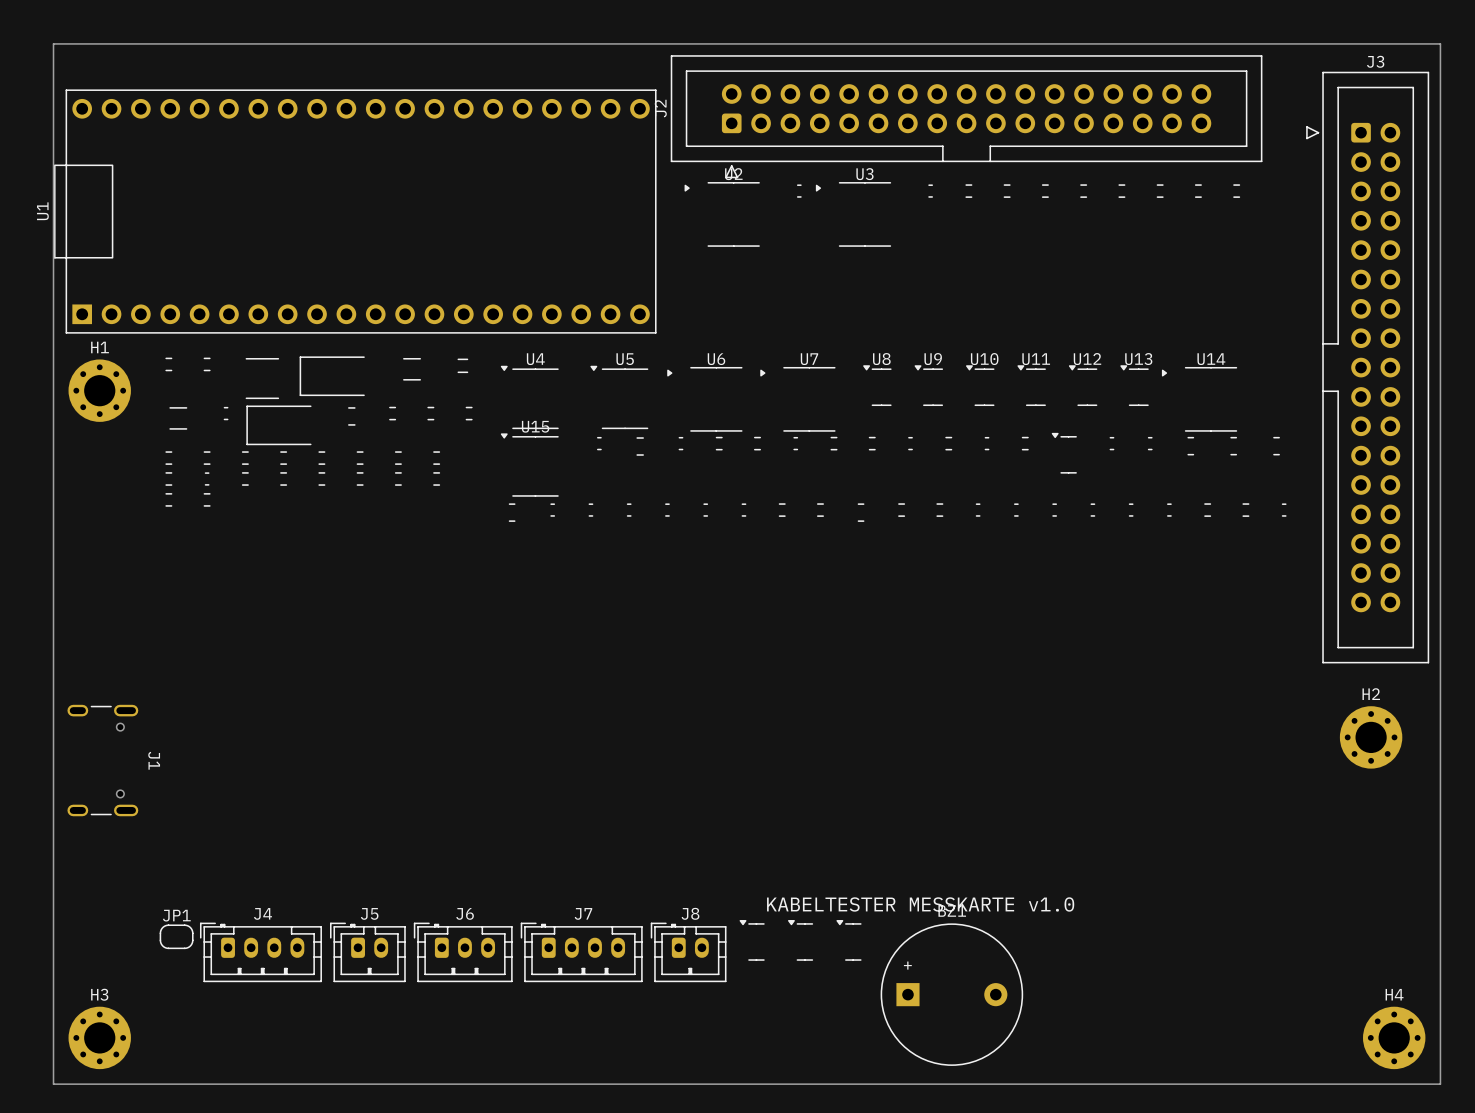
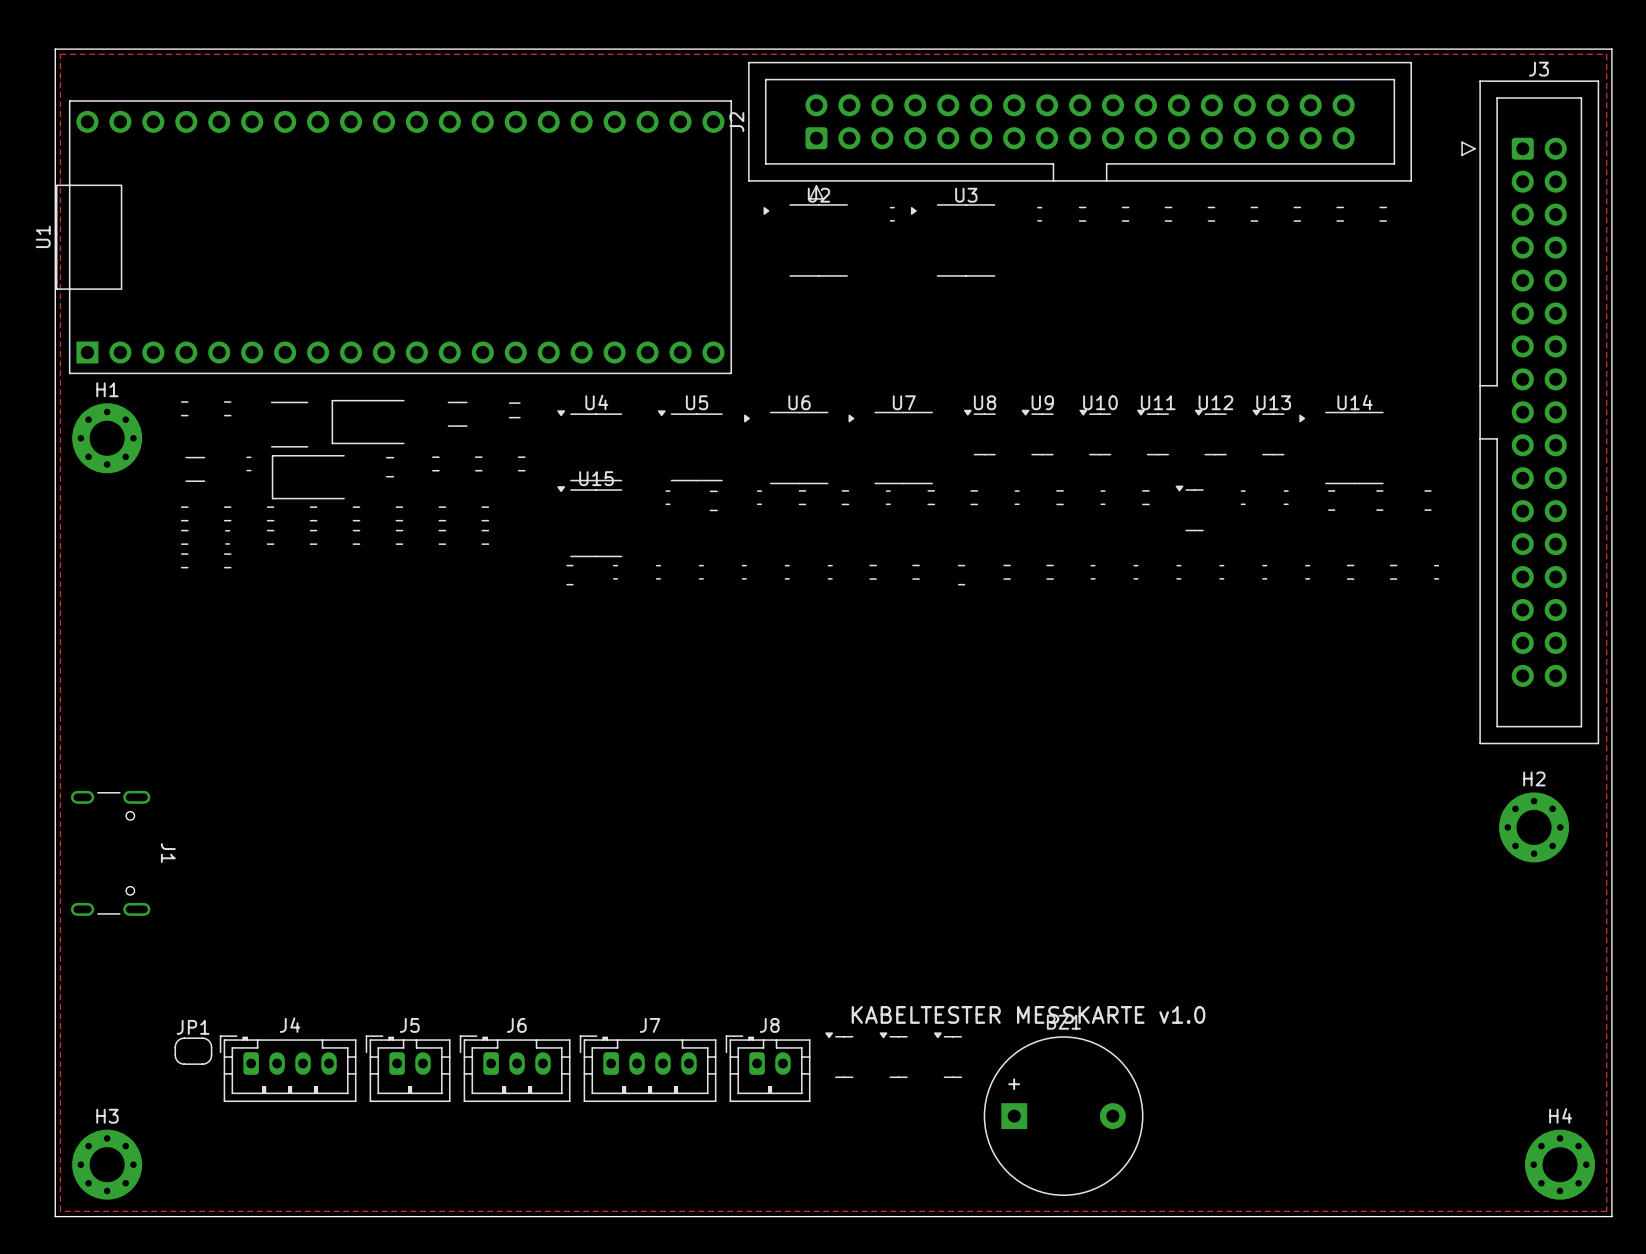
zone outline: none -> (60, 54) (1606, 54) (1606, 1211) (60, 1211) (60, 54)

